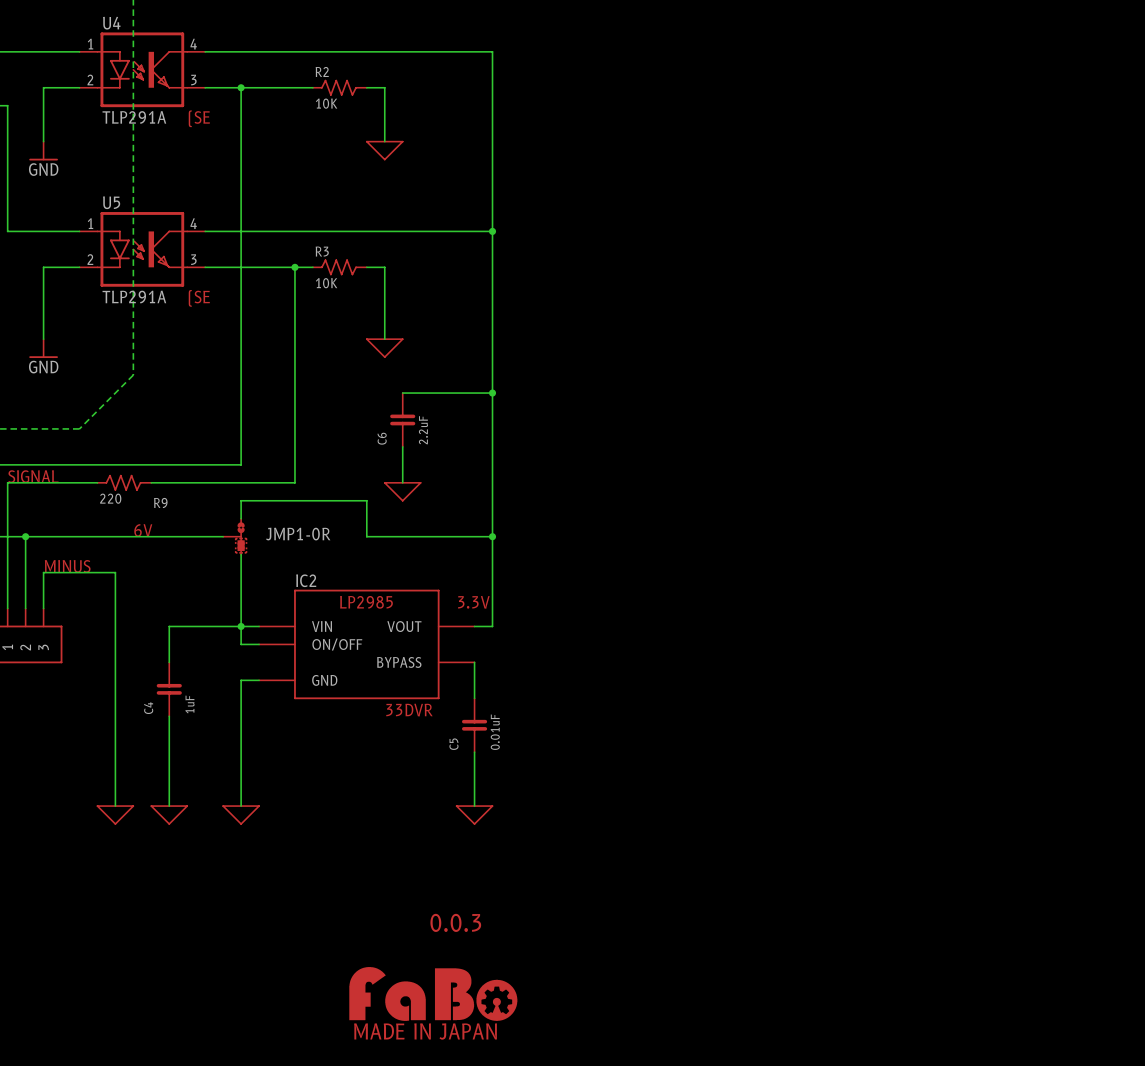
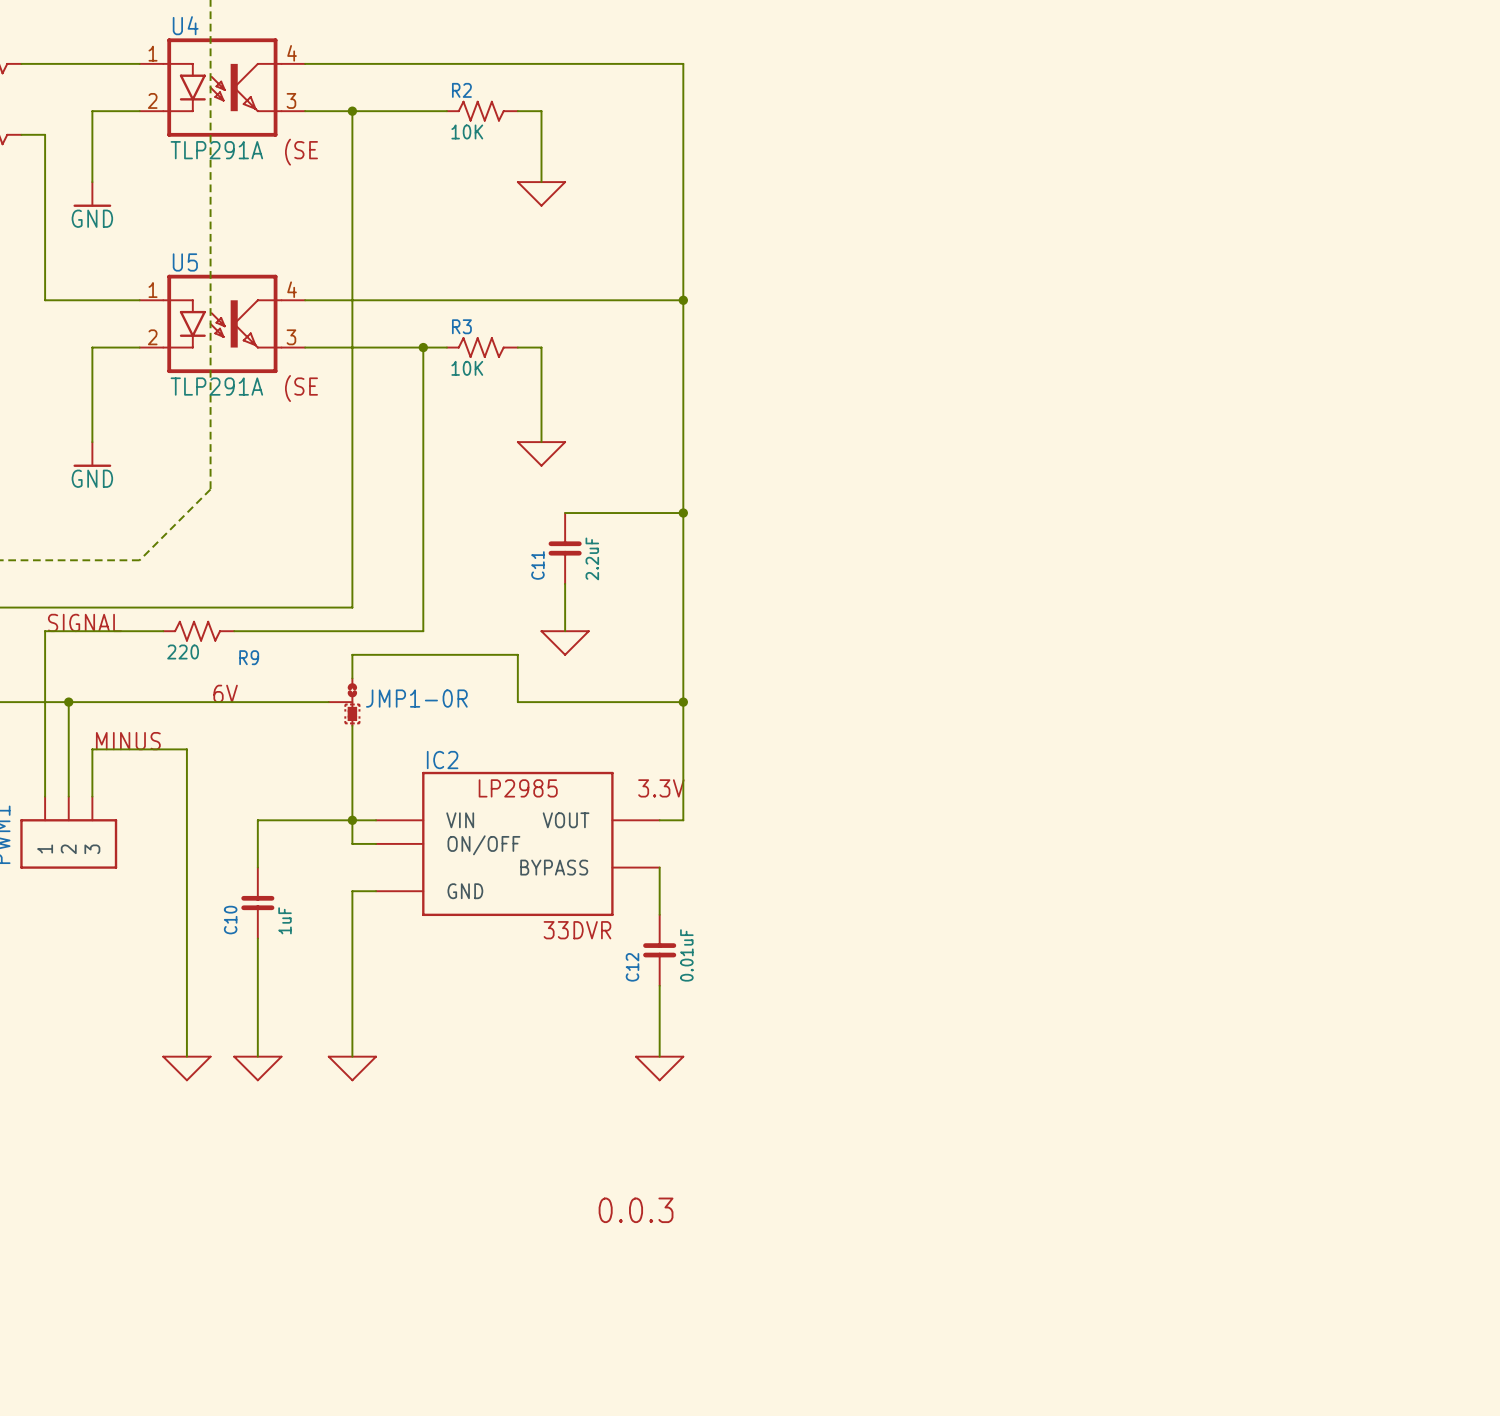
C6 name: C6 (382, 438) -> C11 (537, 565)
C4 name: C4 (148, 708) -> C10 (230, 920)
C5 name: C5 (453, 744) -> C12 (632, 967)
part: (433, 993) -> none

